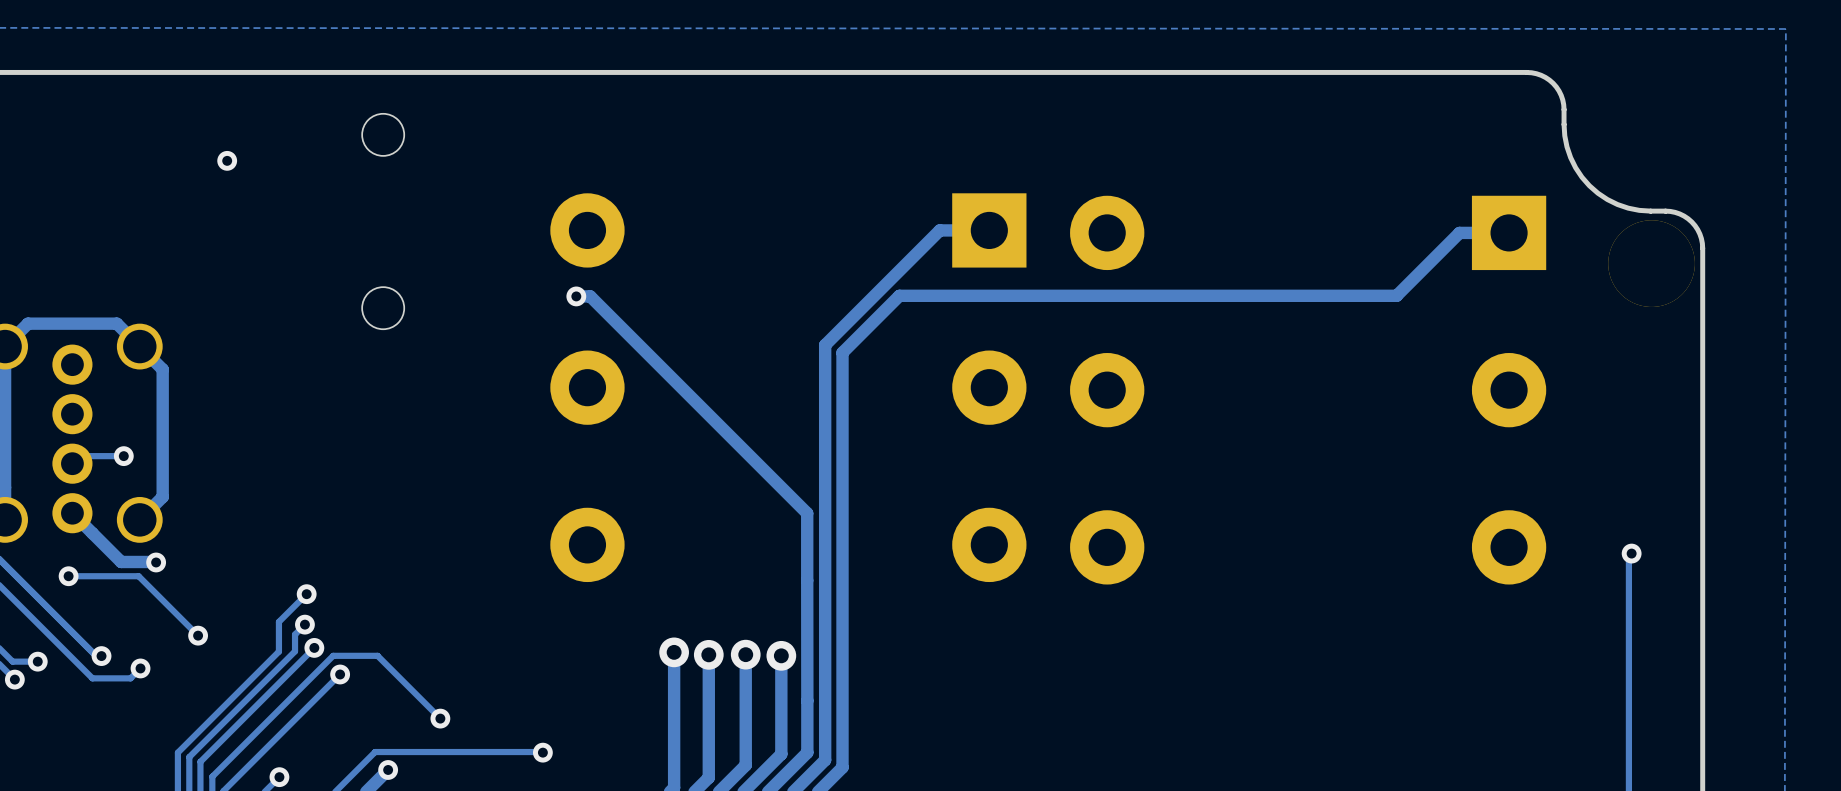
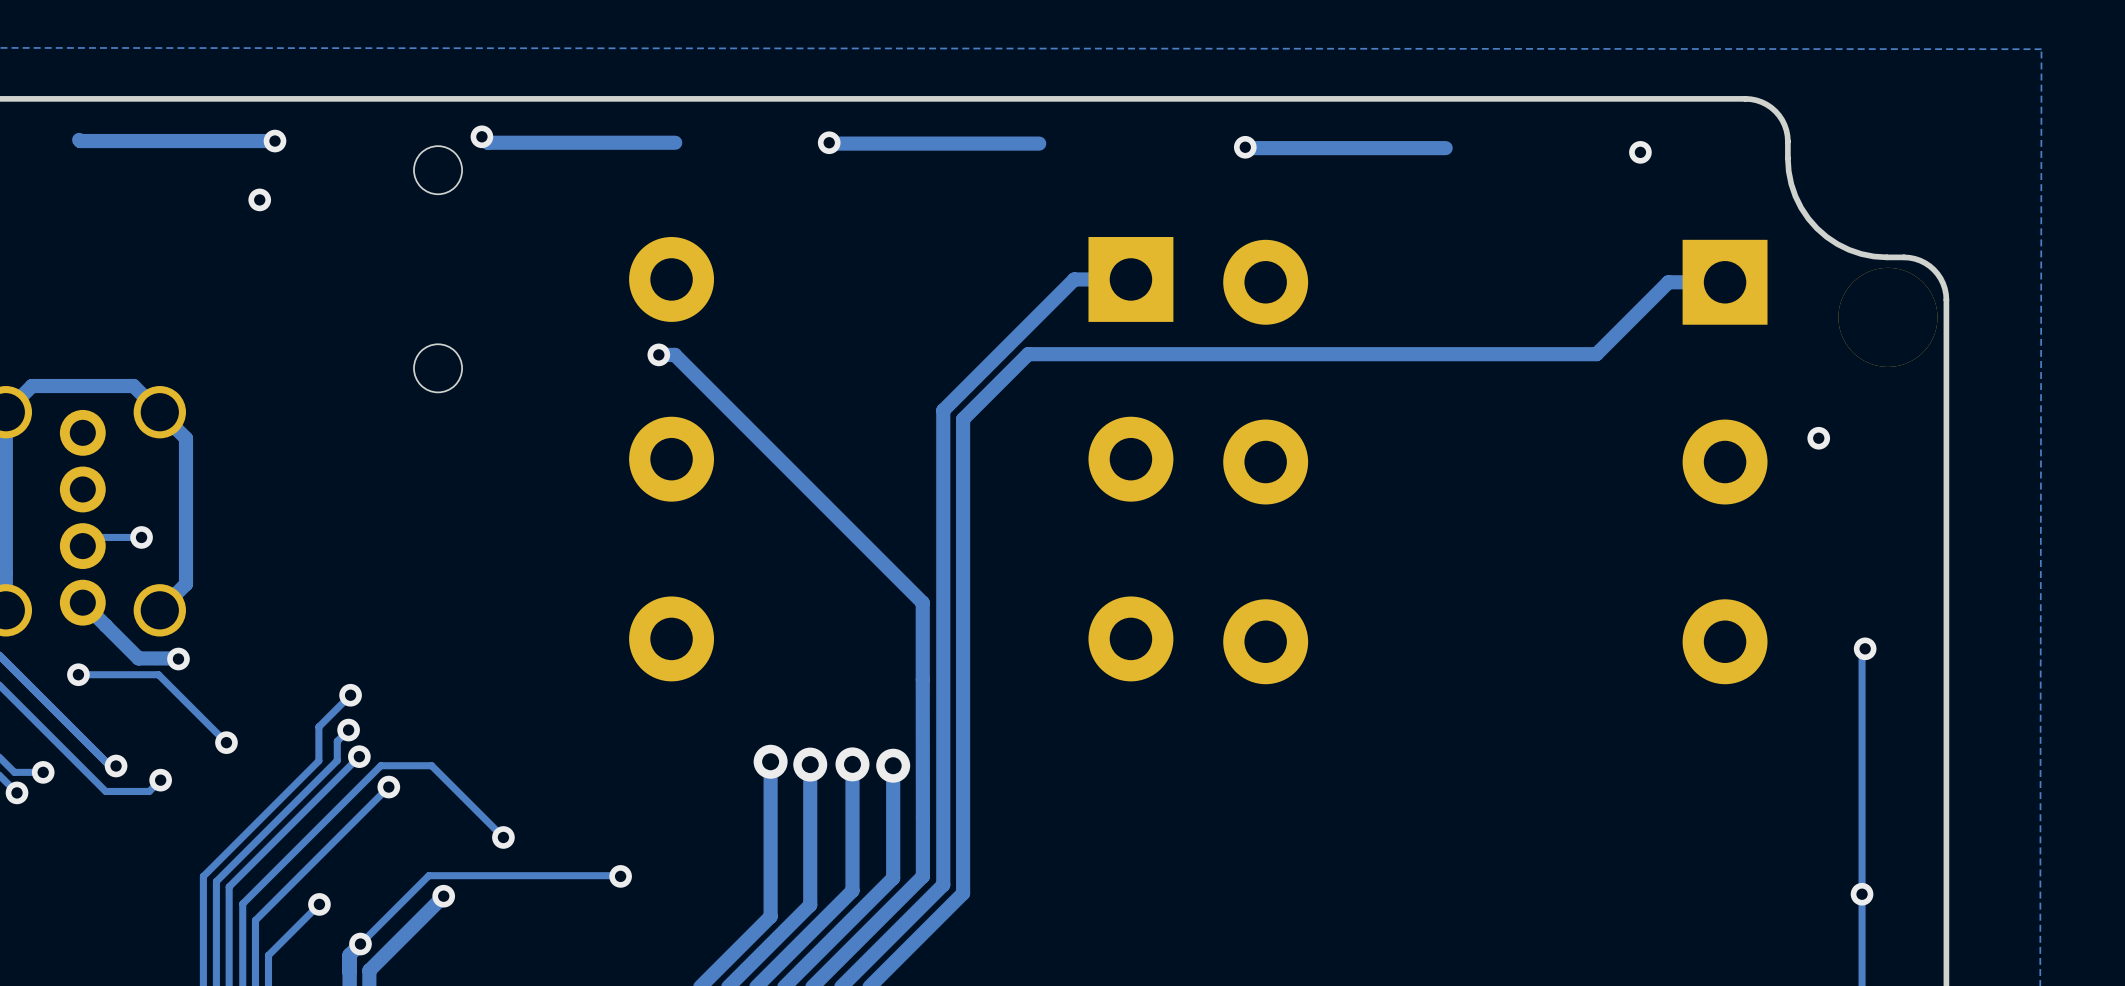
track: none -> (481, 136) (487, 142) (675, 142)
via: none -> (481, 136)
track: none -> (79, 139) (275, 141)
via: none -> (275, 141)
track: none -> (829, 142) (1039, 143)
via: none -> (829, 142)
track: none -> (1245, 147) (1445, 148)
via: none -> (1245, 147)
via: none -> (1640, 152)
via: none -> (1818, 438)
via: none -> (1862, 894)

